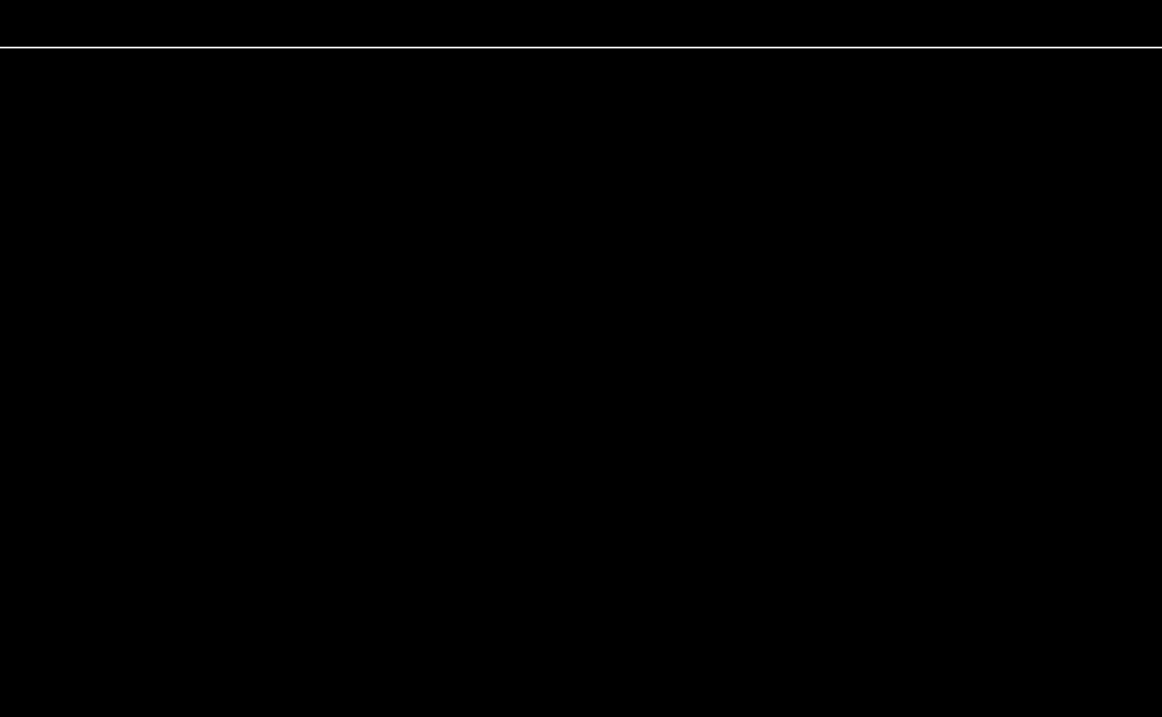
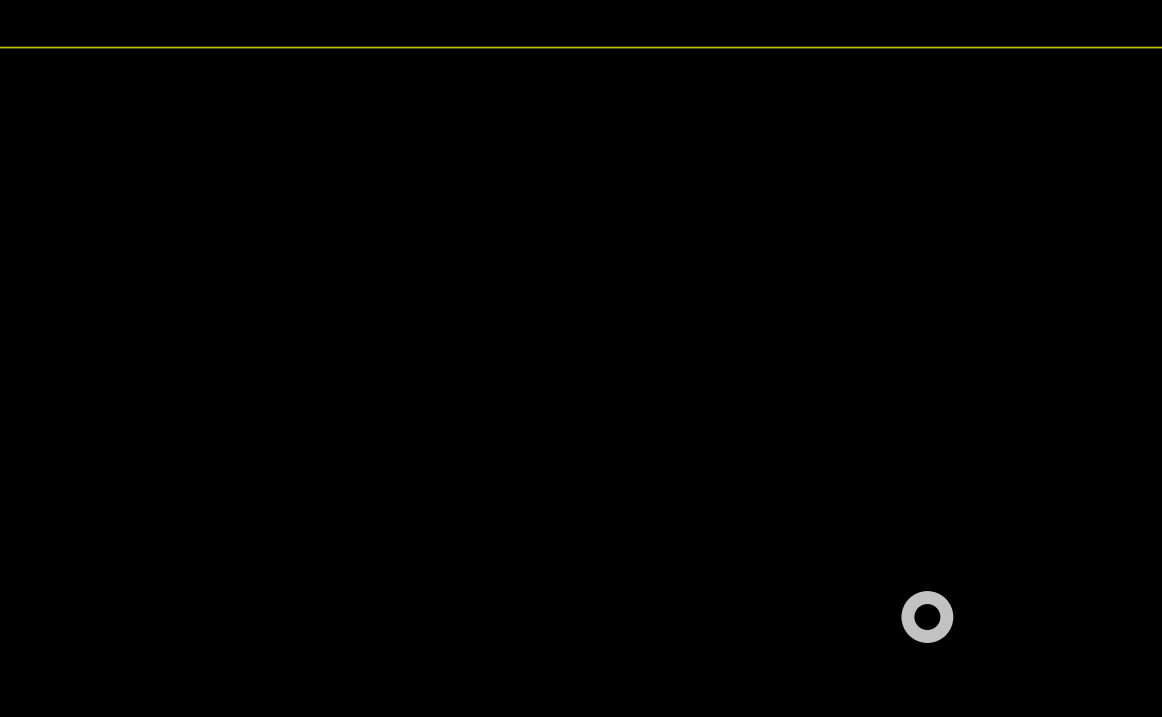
via: none -> (927, 617)

